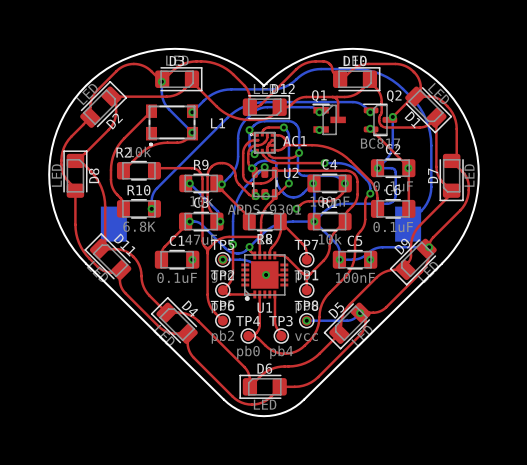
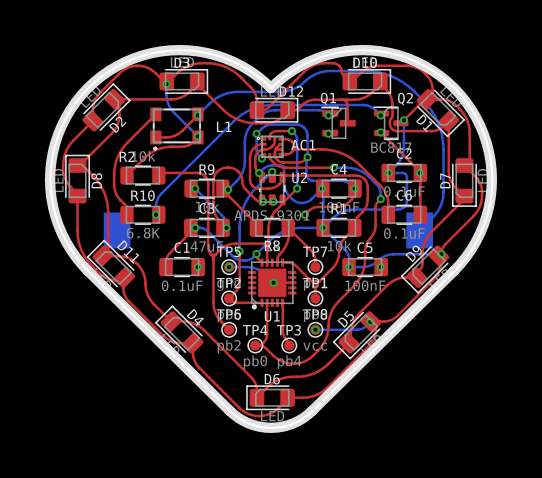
line: none -> (270, 87) (249, 70) (233, 61) (197, 51) (161, 51) (125, 61) (94, 81) (70, 109) (55, 143) (50, 179) (51, 197) (58, 224) (70, 249) (81, 264) (233, 414) (254, 425) (270, 427) (293, 423) (308, 414) (460, 264) (471, 249) (483, 224) (490, 197) (491, 179) (486, 143) (471, 109) (447, 81) (416, 61) (380, 51) (344, 51) (326, 55) (300, 65) (270, 87)
top track: none -> (197, 115) (177, 134) (168, 137) (155, 137)

